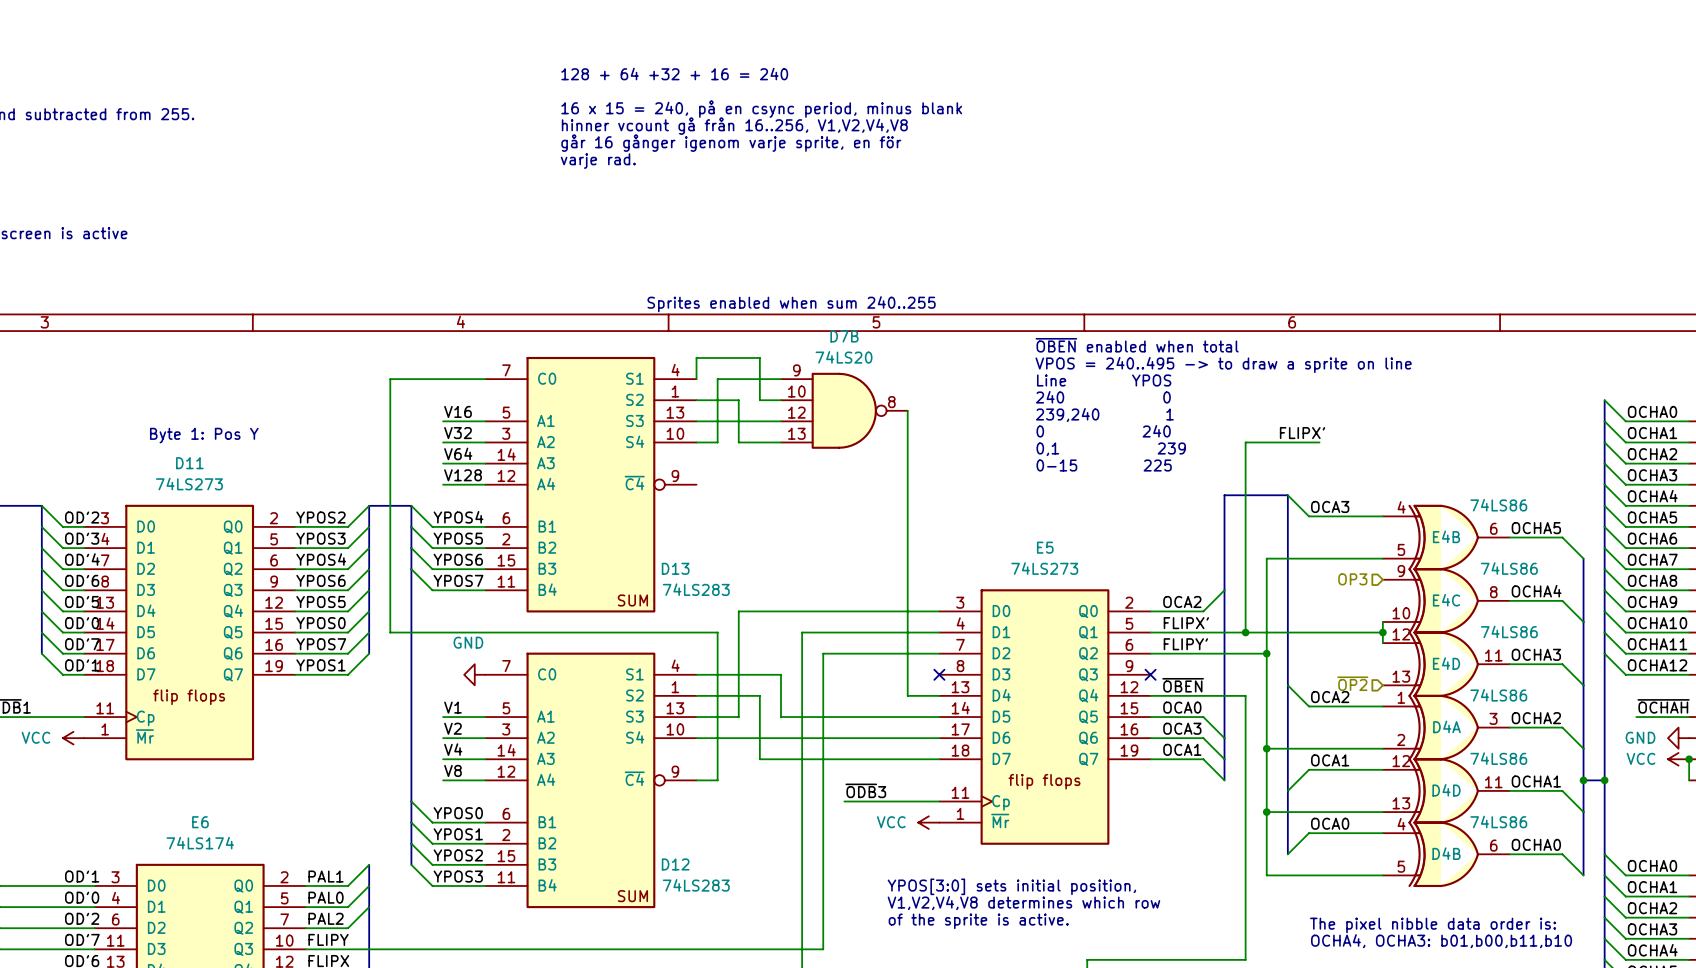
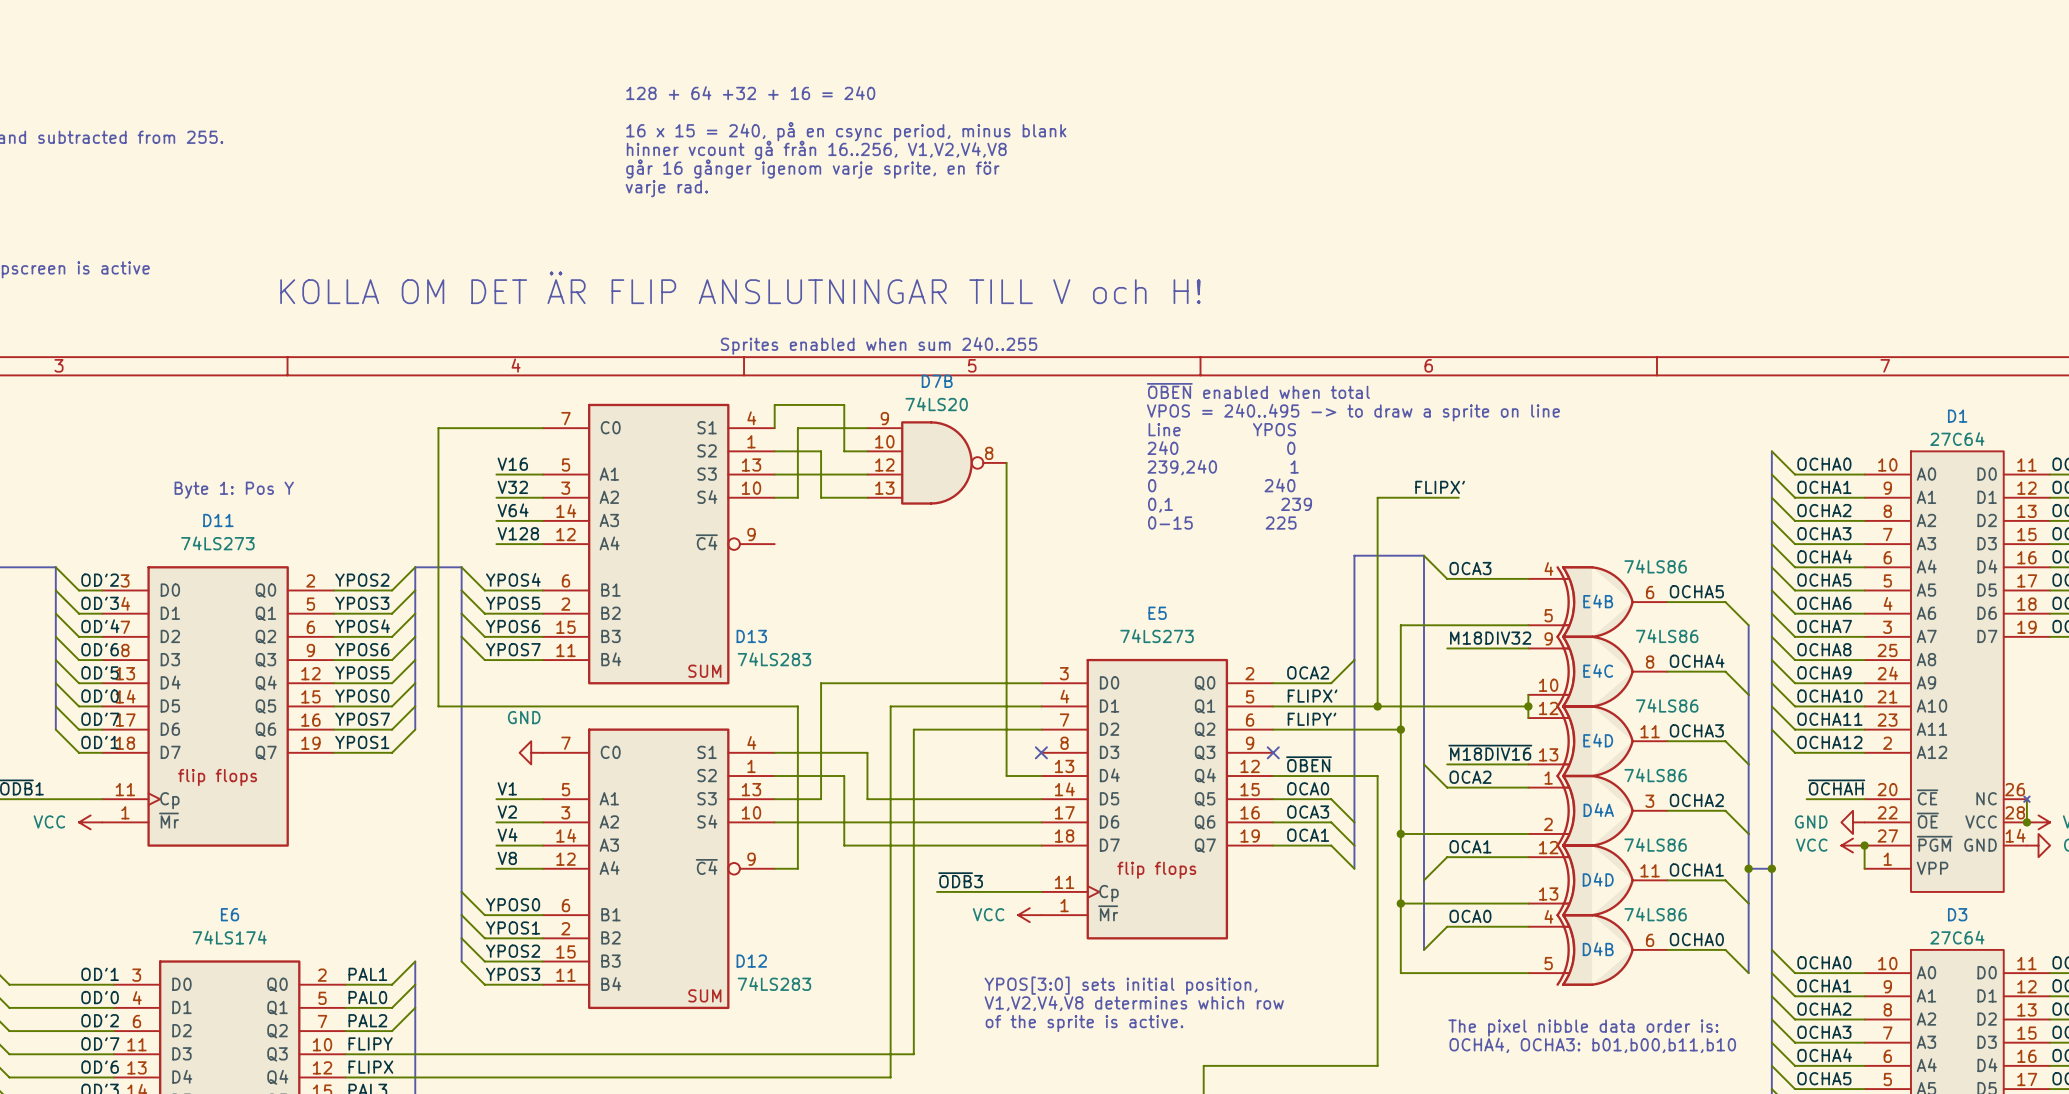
text: none -> KOLLA OM DET ÄR FLIP ANSLUTNINGAR TILL V och H! (740, 287)
label: none -> M18DIV32 (1490, 638)
wire: none -> (1447, 648) (1528, 648)
hierarchical label: OP3 (1352, 579) -> none
label: none -> ~{M18DIV16} (1490, 752)
hierarchical label: ~{OP2} (1352, 683) -> none
wire: none -> (1447, 764) (1528, 764)

